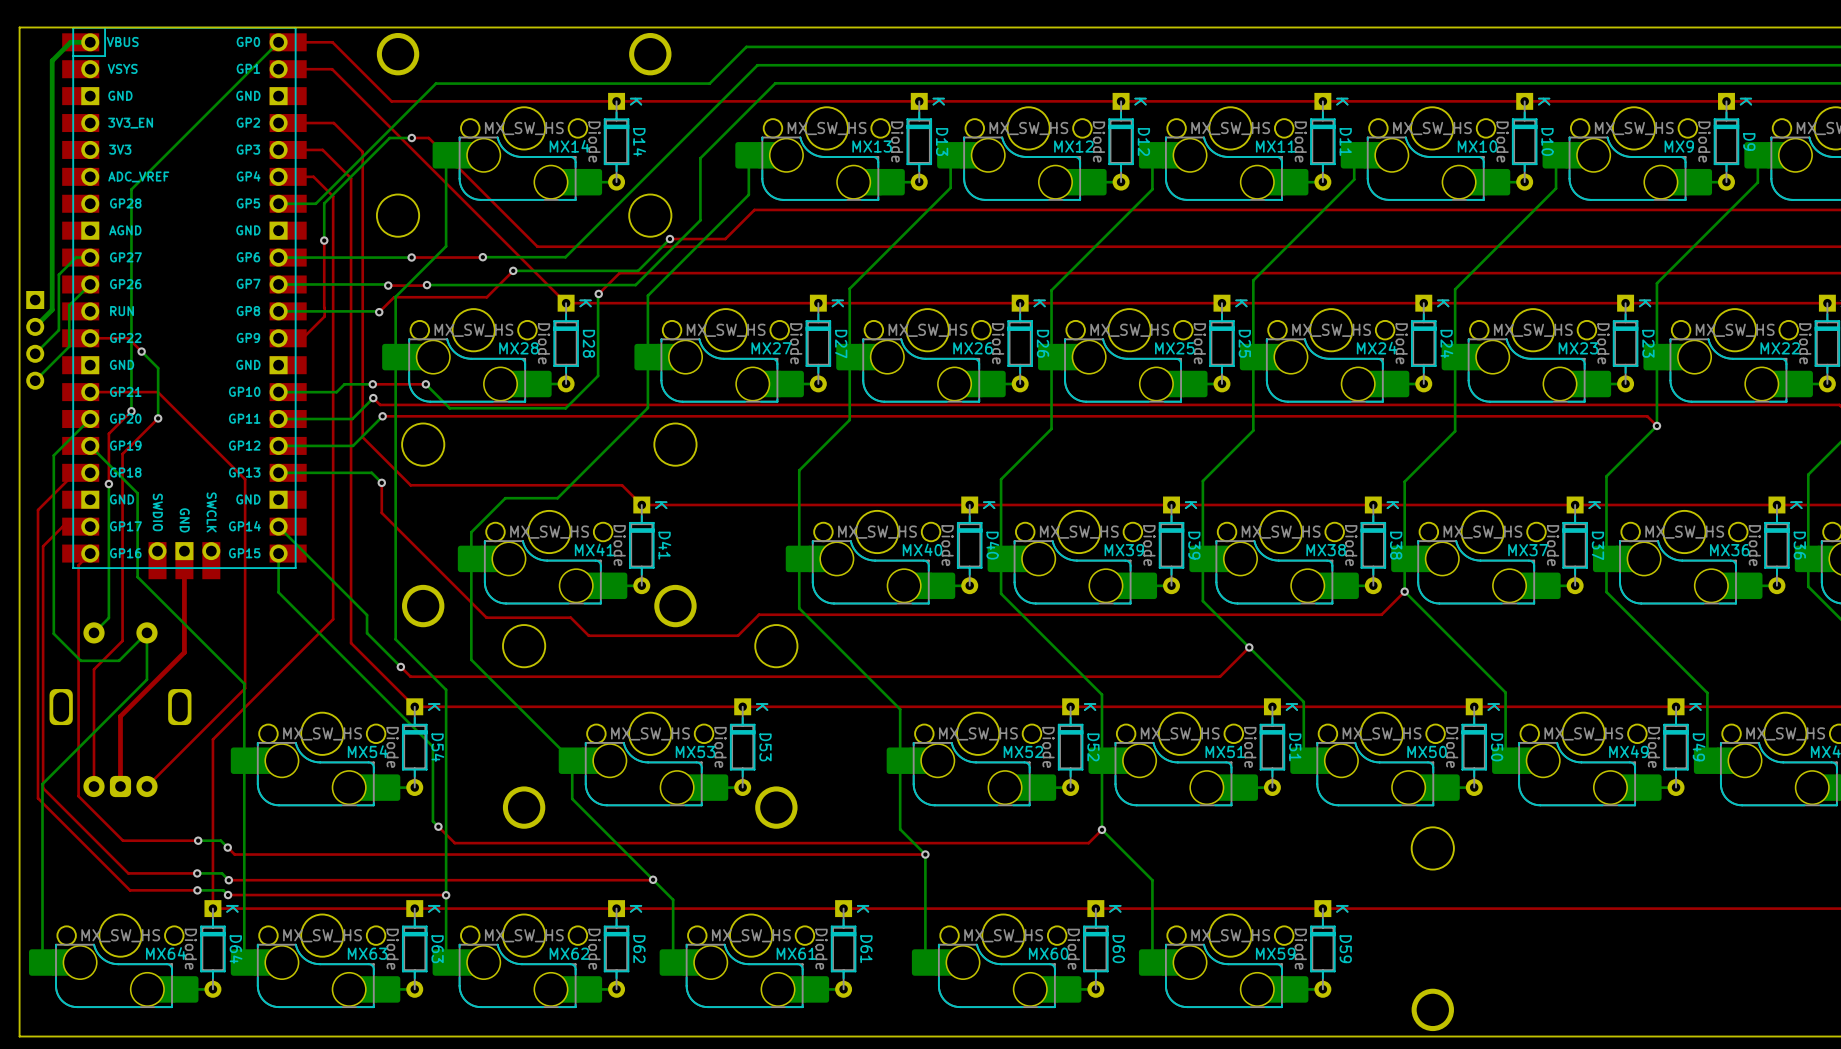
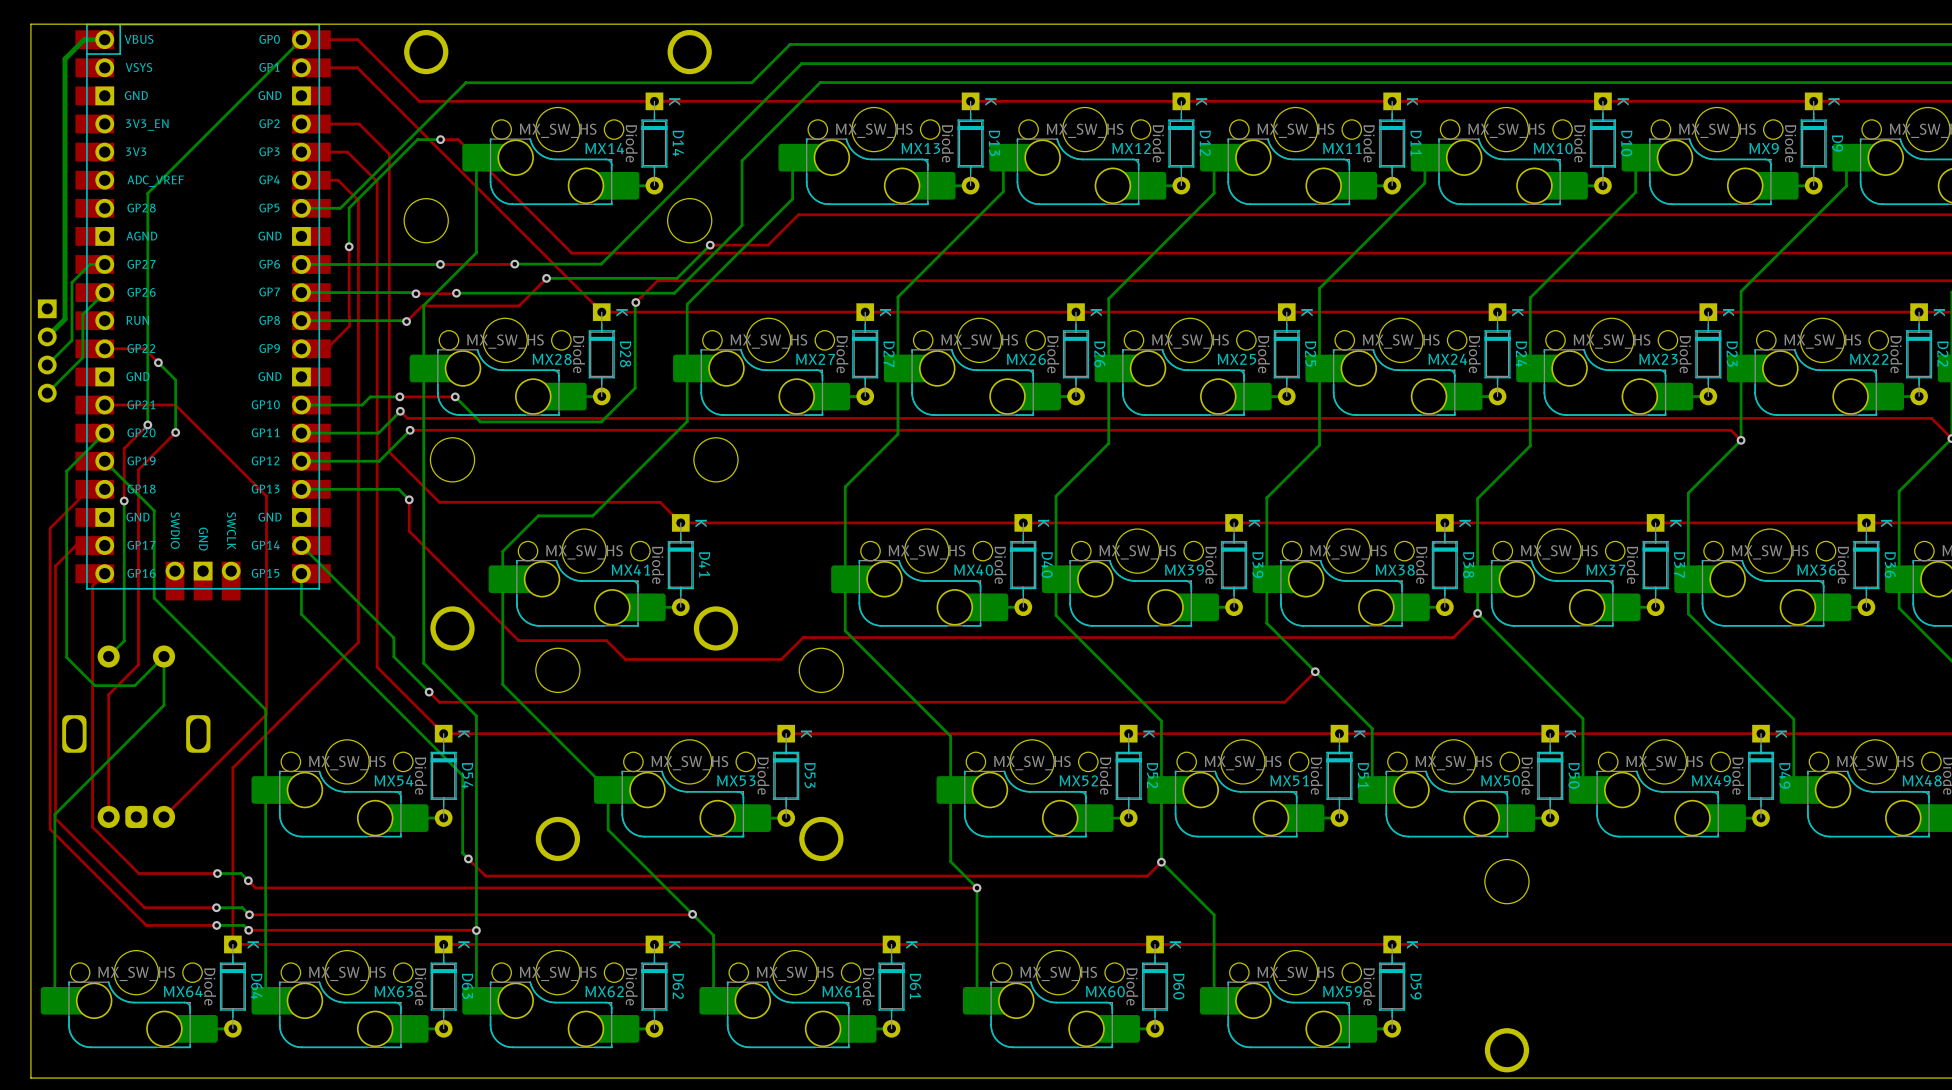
top track: (184, 551) (184, 652) (120, 716) (120, 786) -> none

